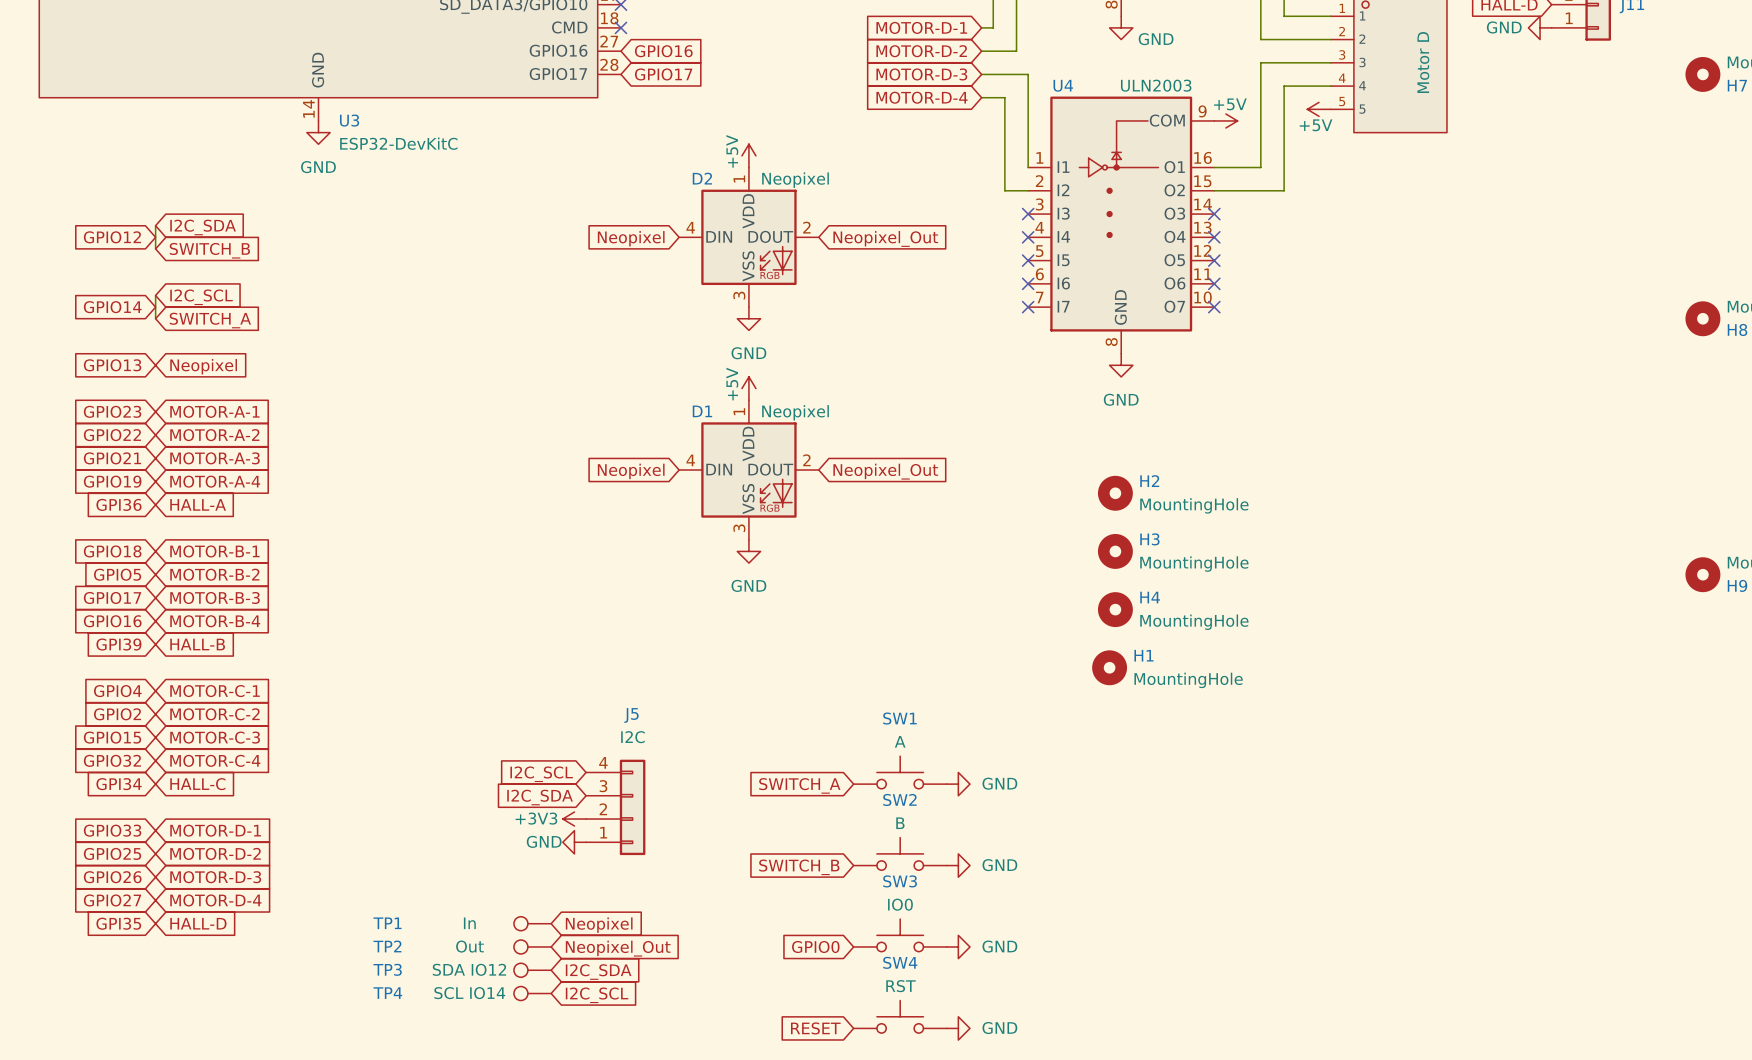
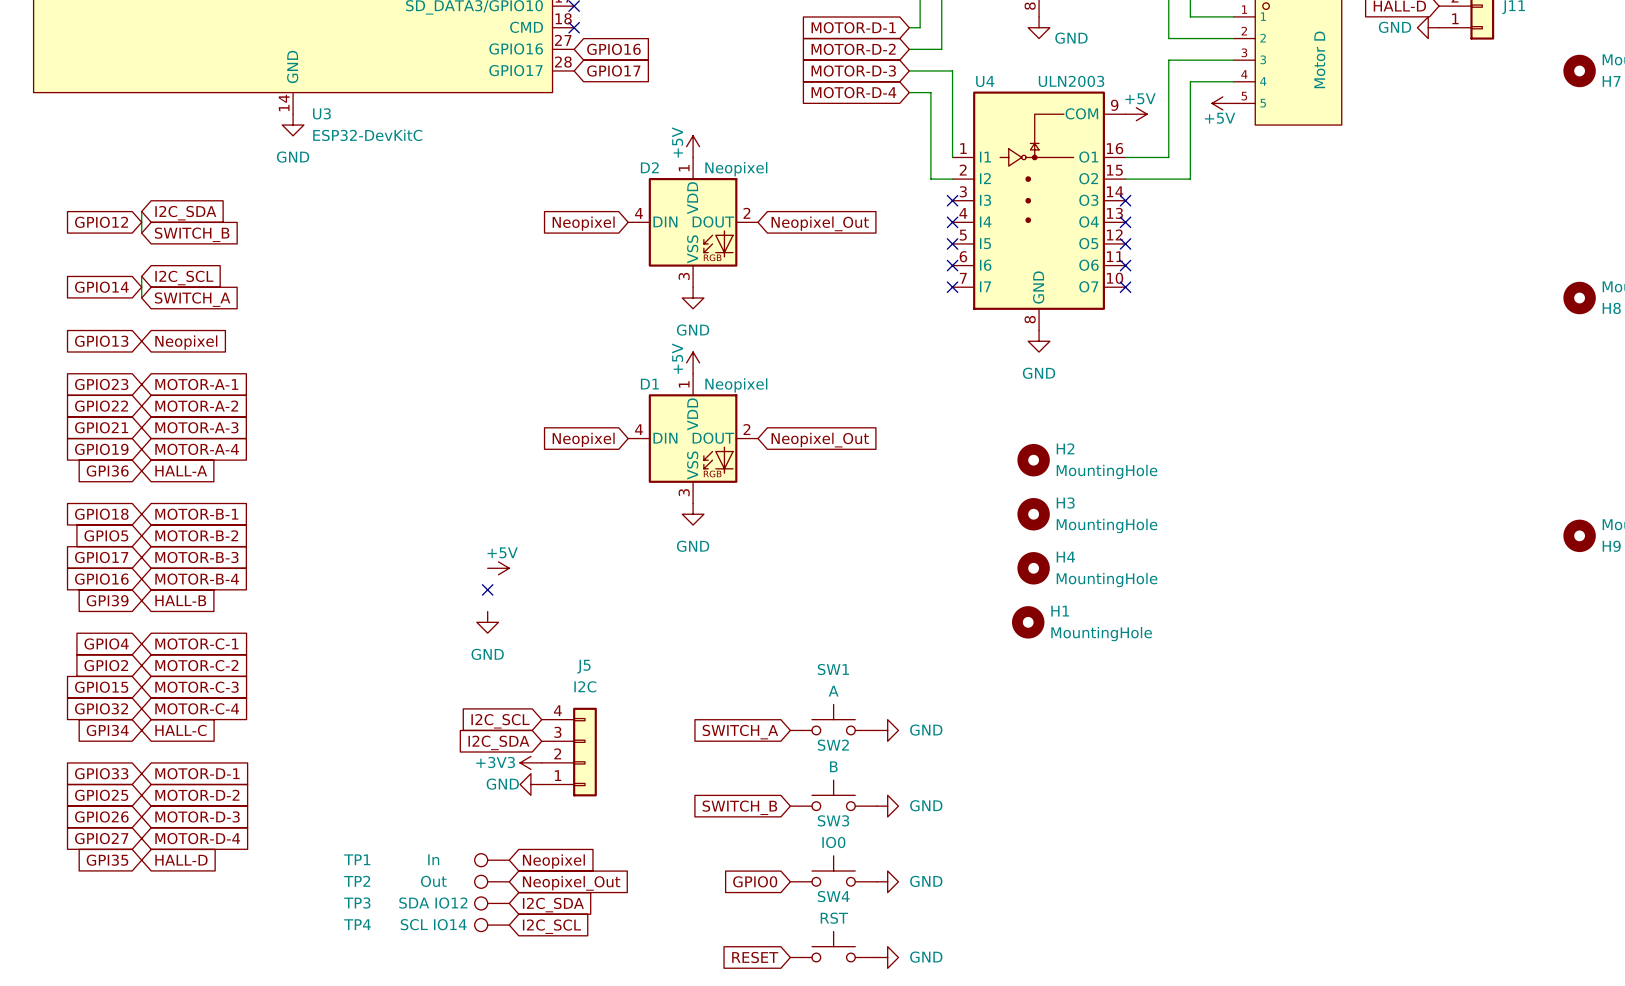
power symbol: none -> +5V (498, 568)
no-connect mark: none -> (487, 589)
power symbol: none -> GND (487, 622)

